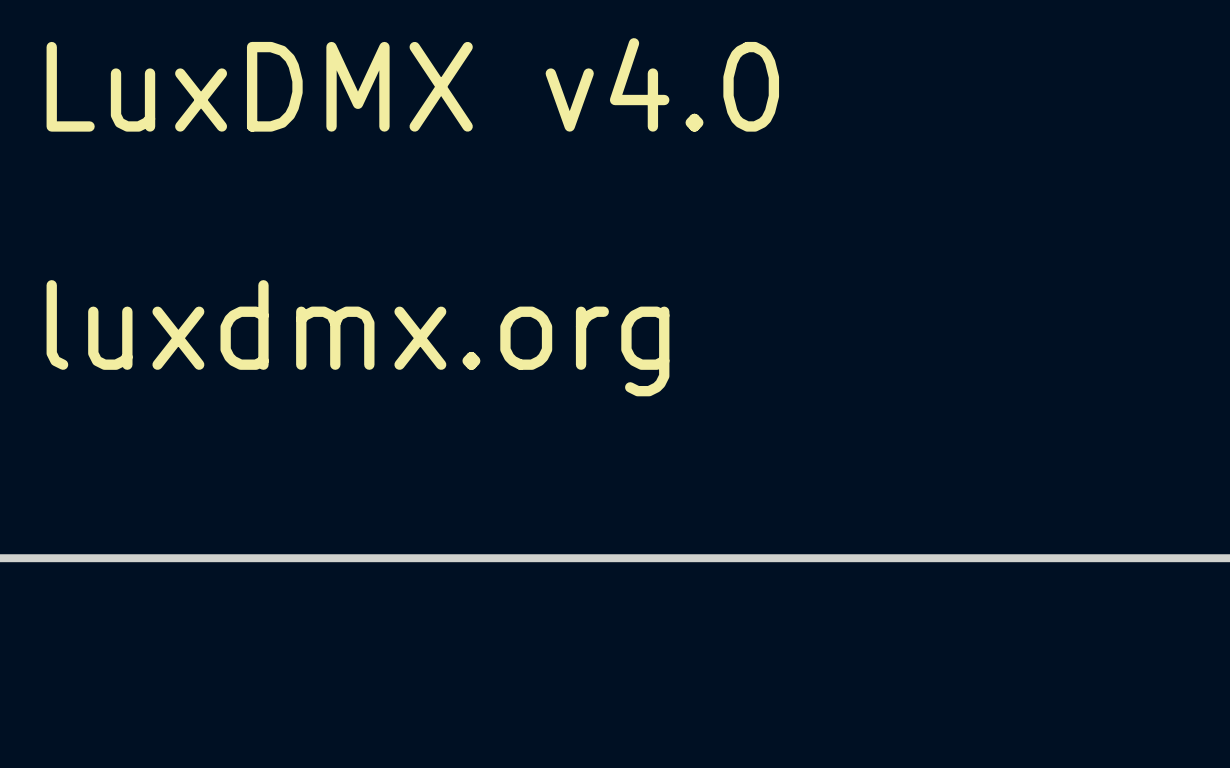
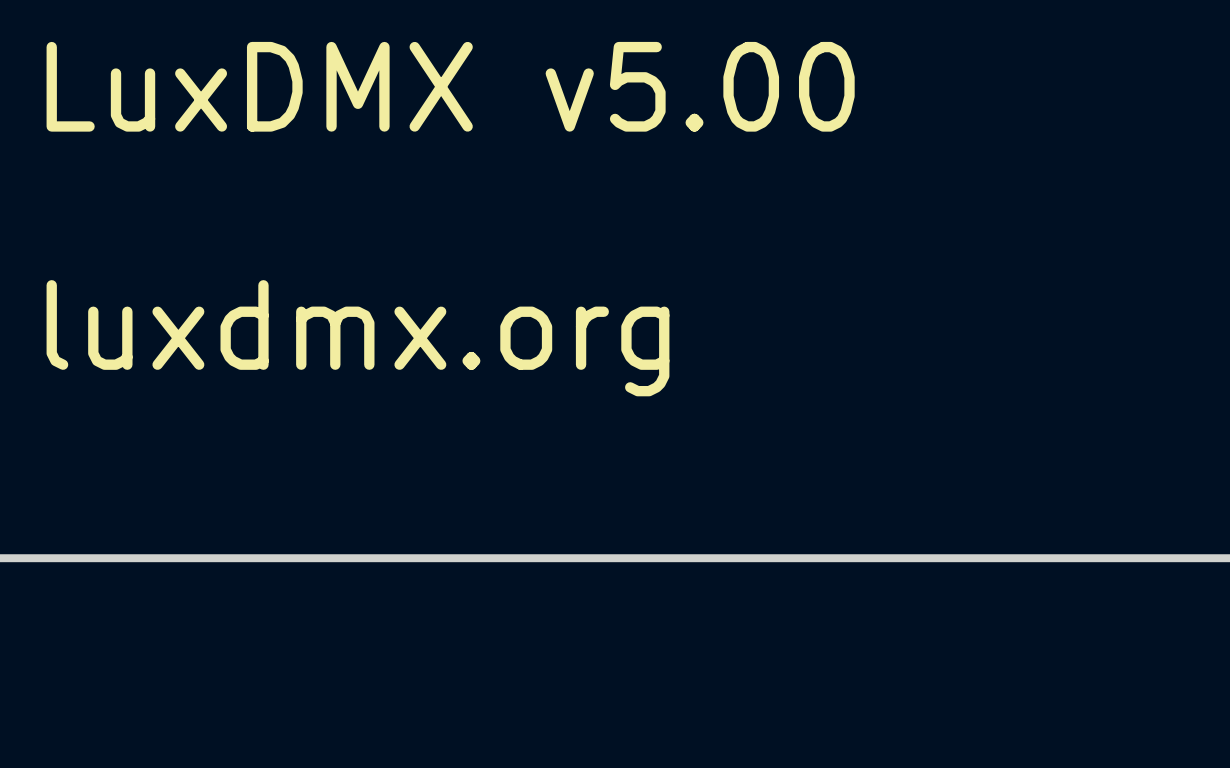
text: LuxDMX v4.0 (412, 84) -> LuxDMX v5.00 (450, 86)

